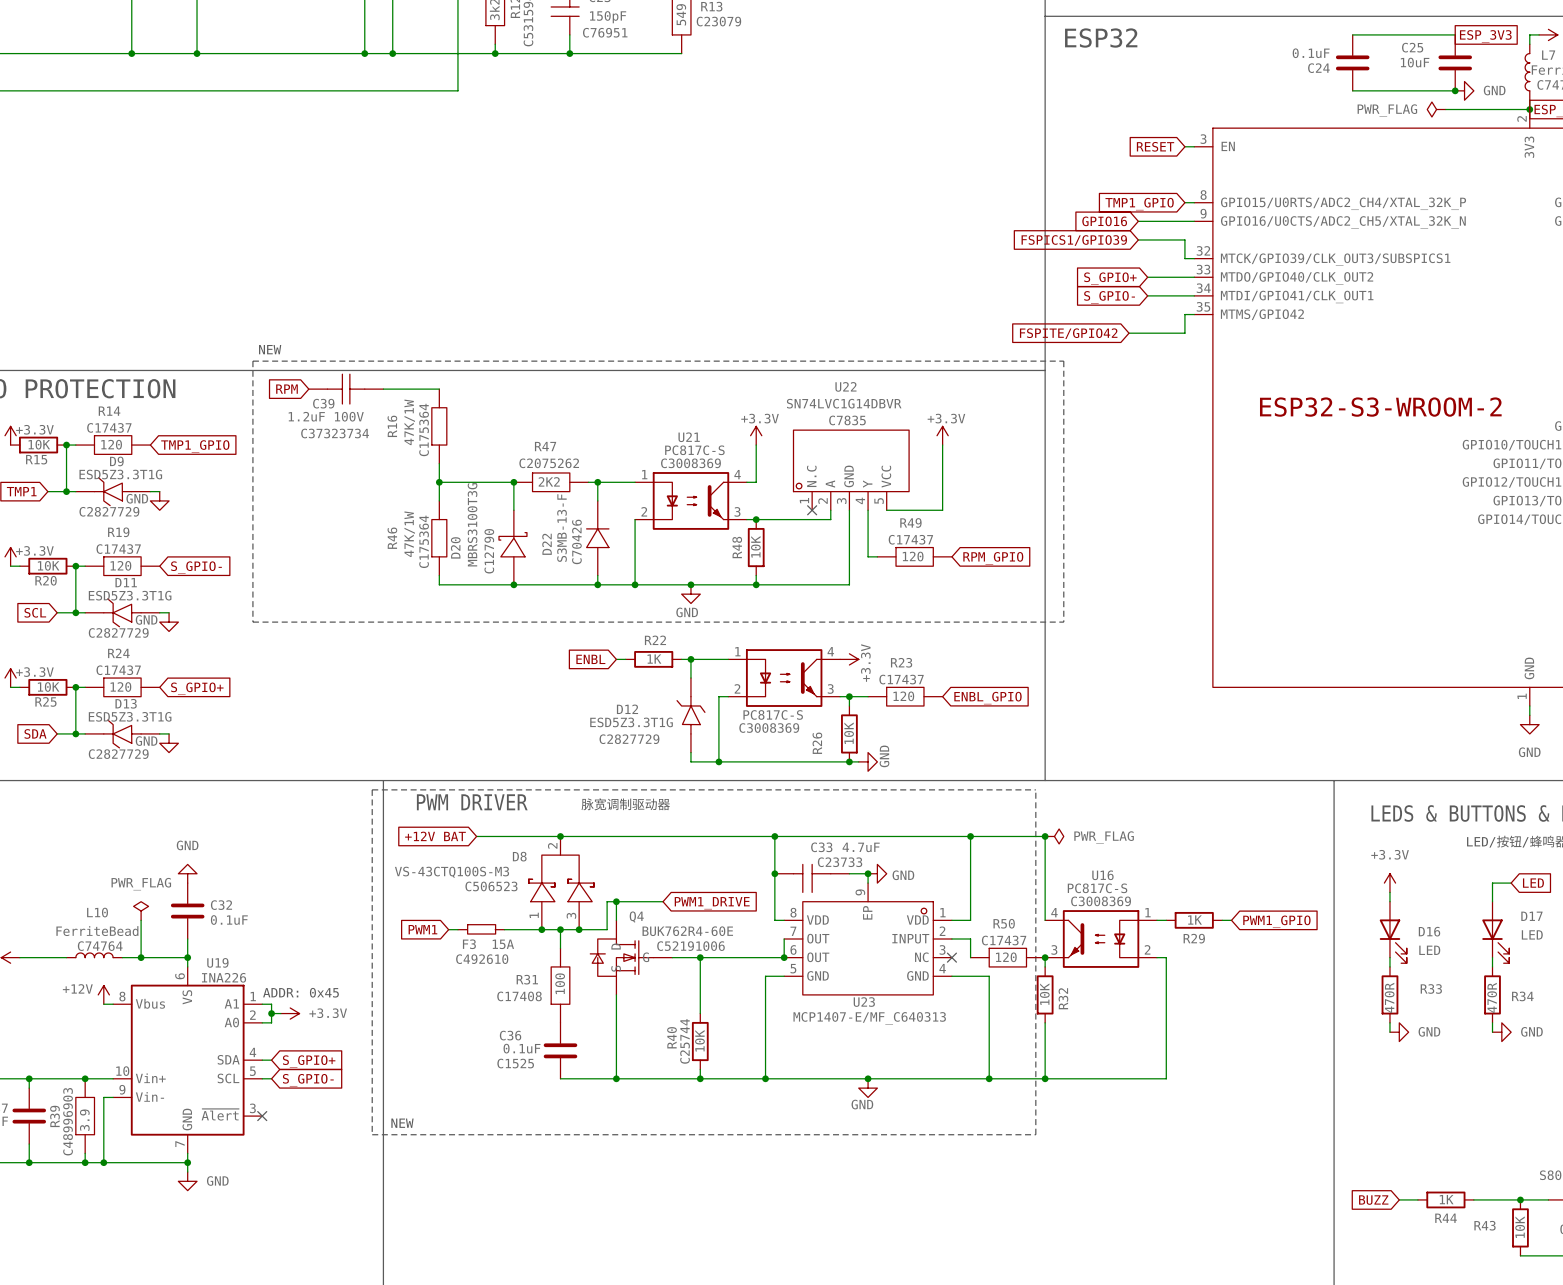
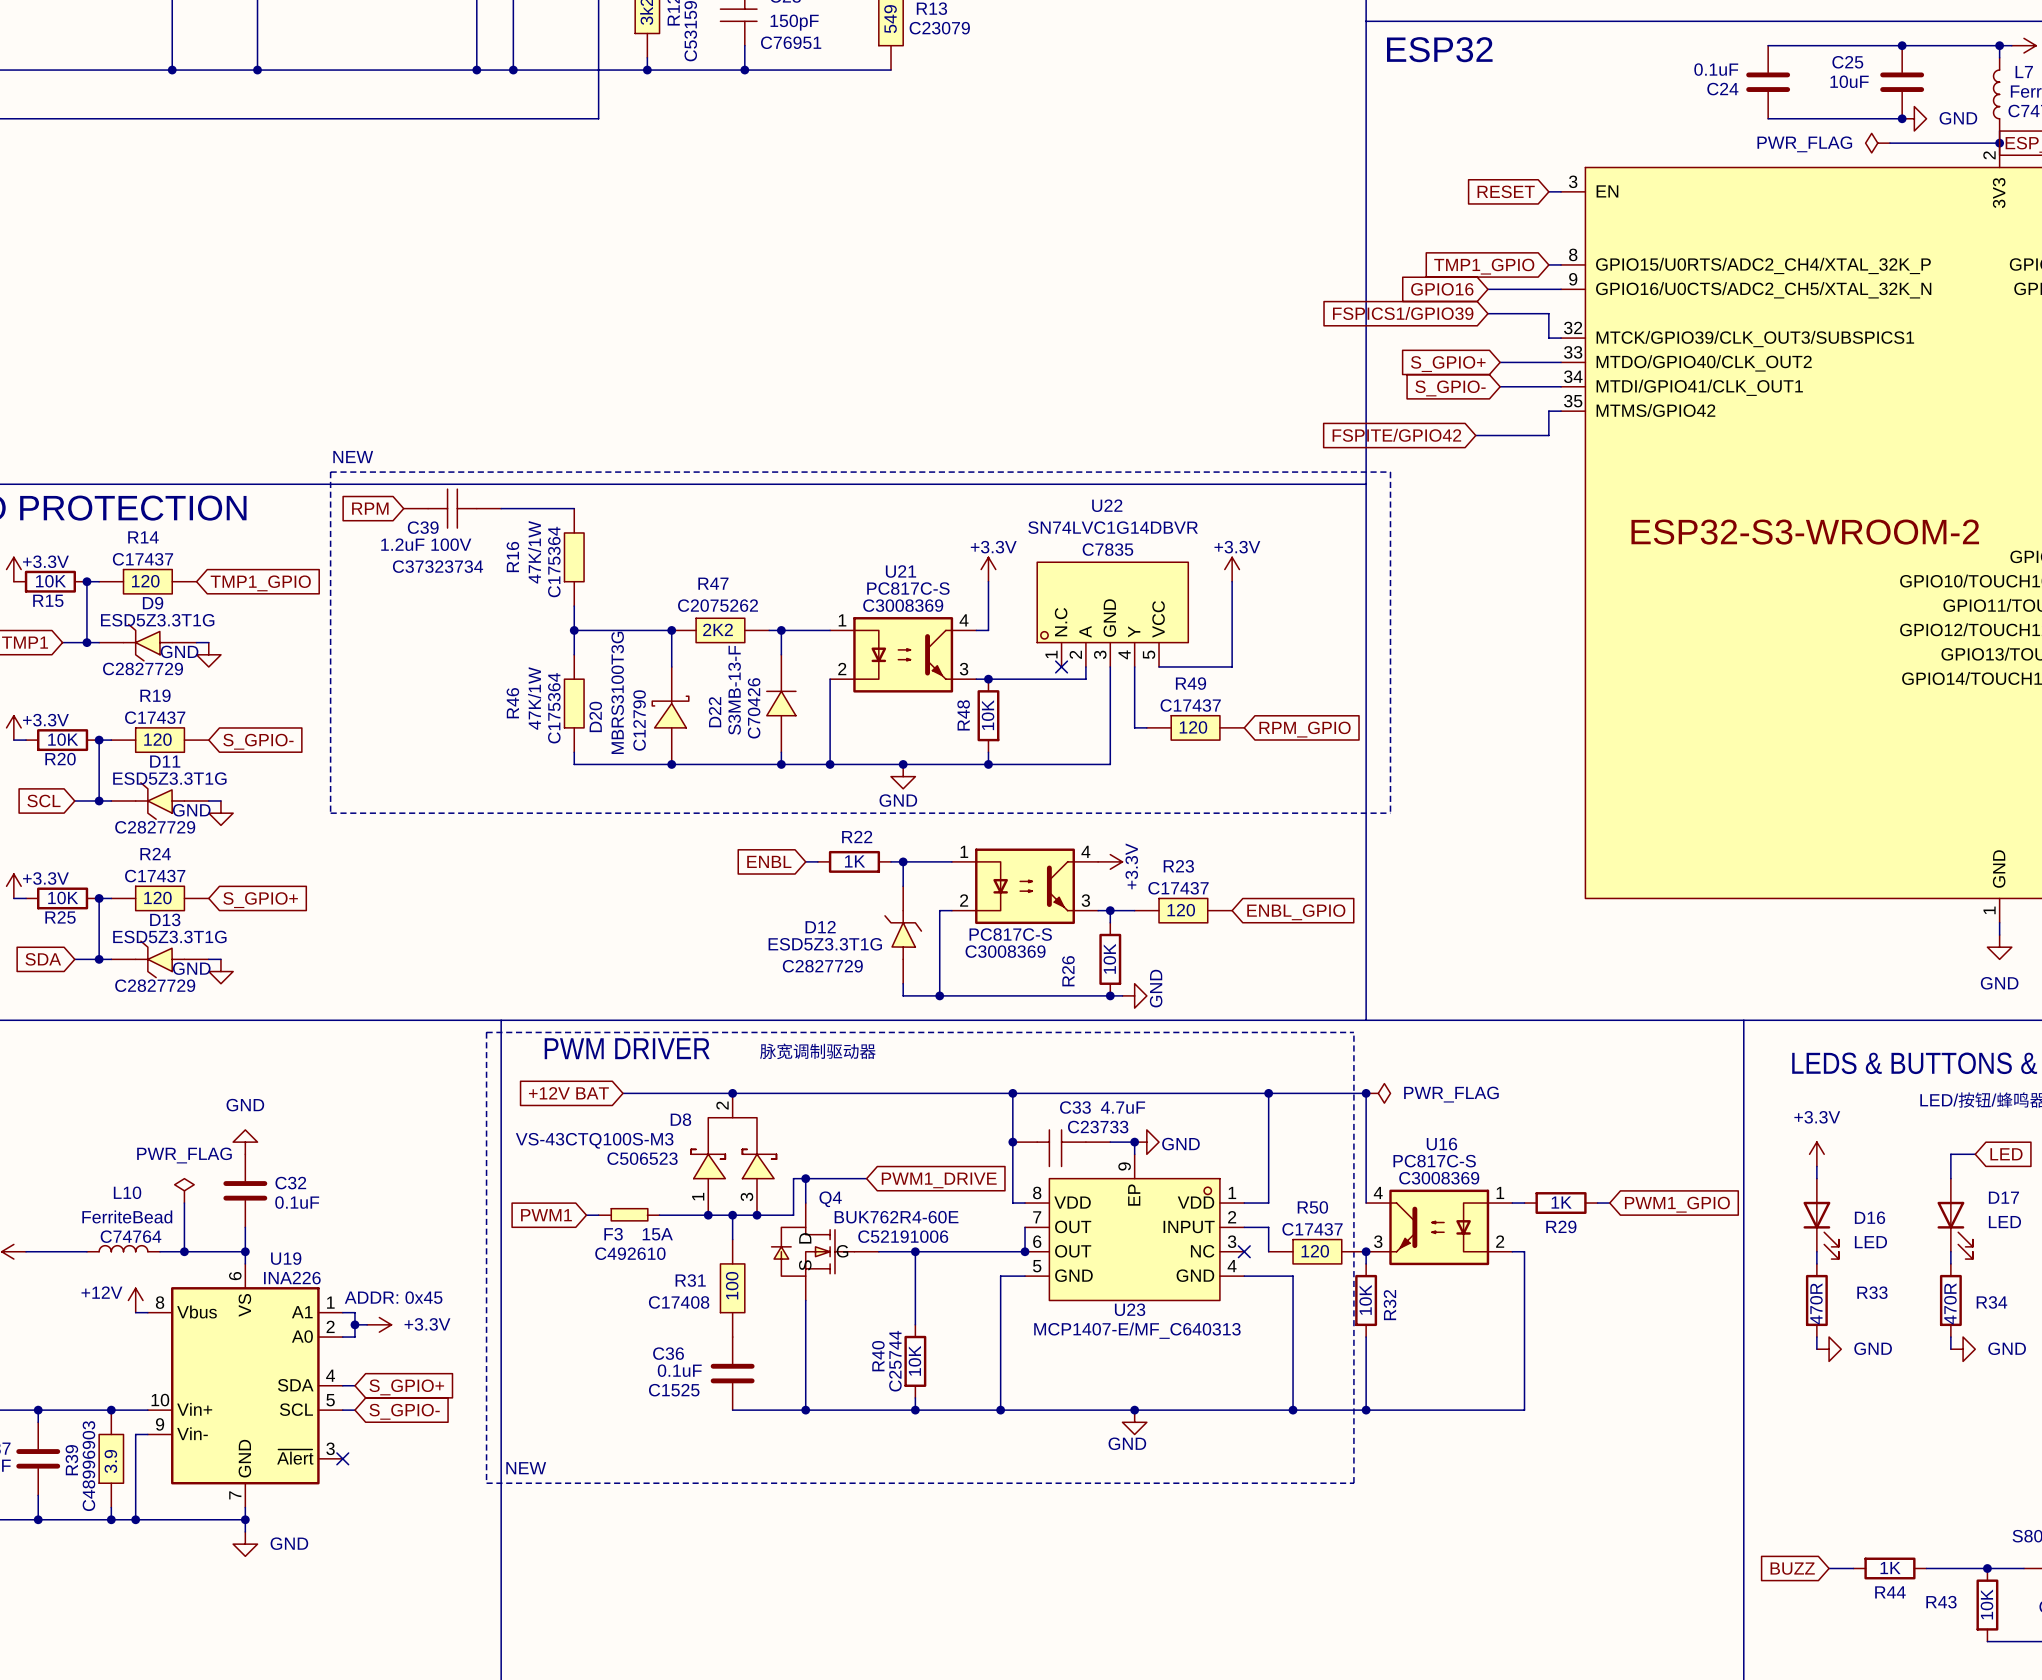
wire: none -> (1902, 45) (1999, 45)
junction: none -> (1902, 45)
junction: none -> (1999, 45)
global label: ESP_3V3 (1485, 36) -> none

